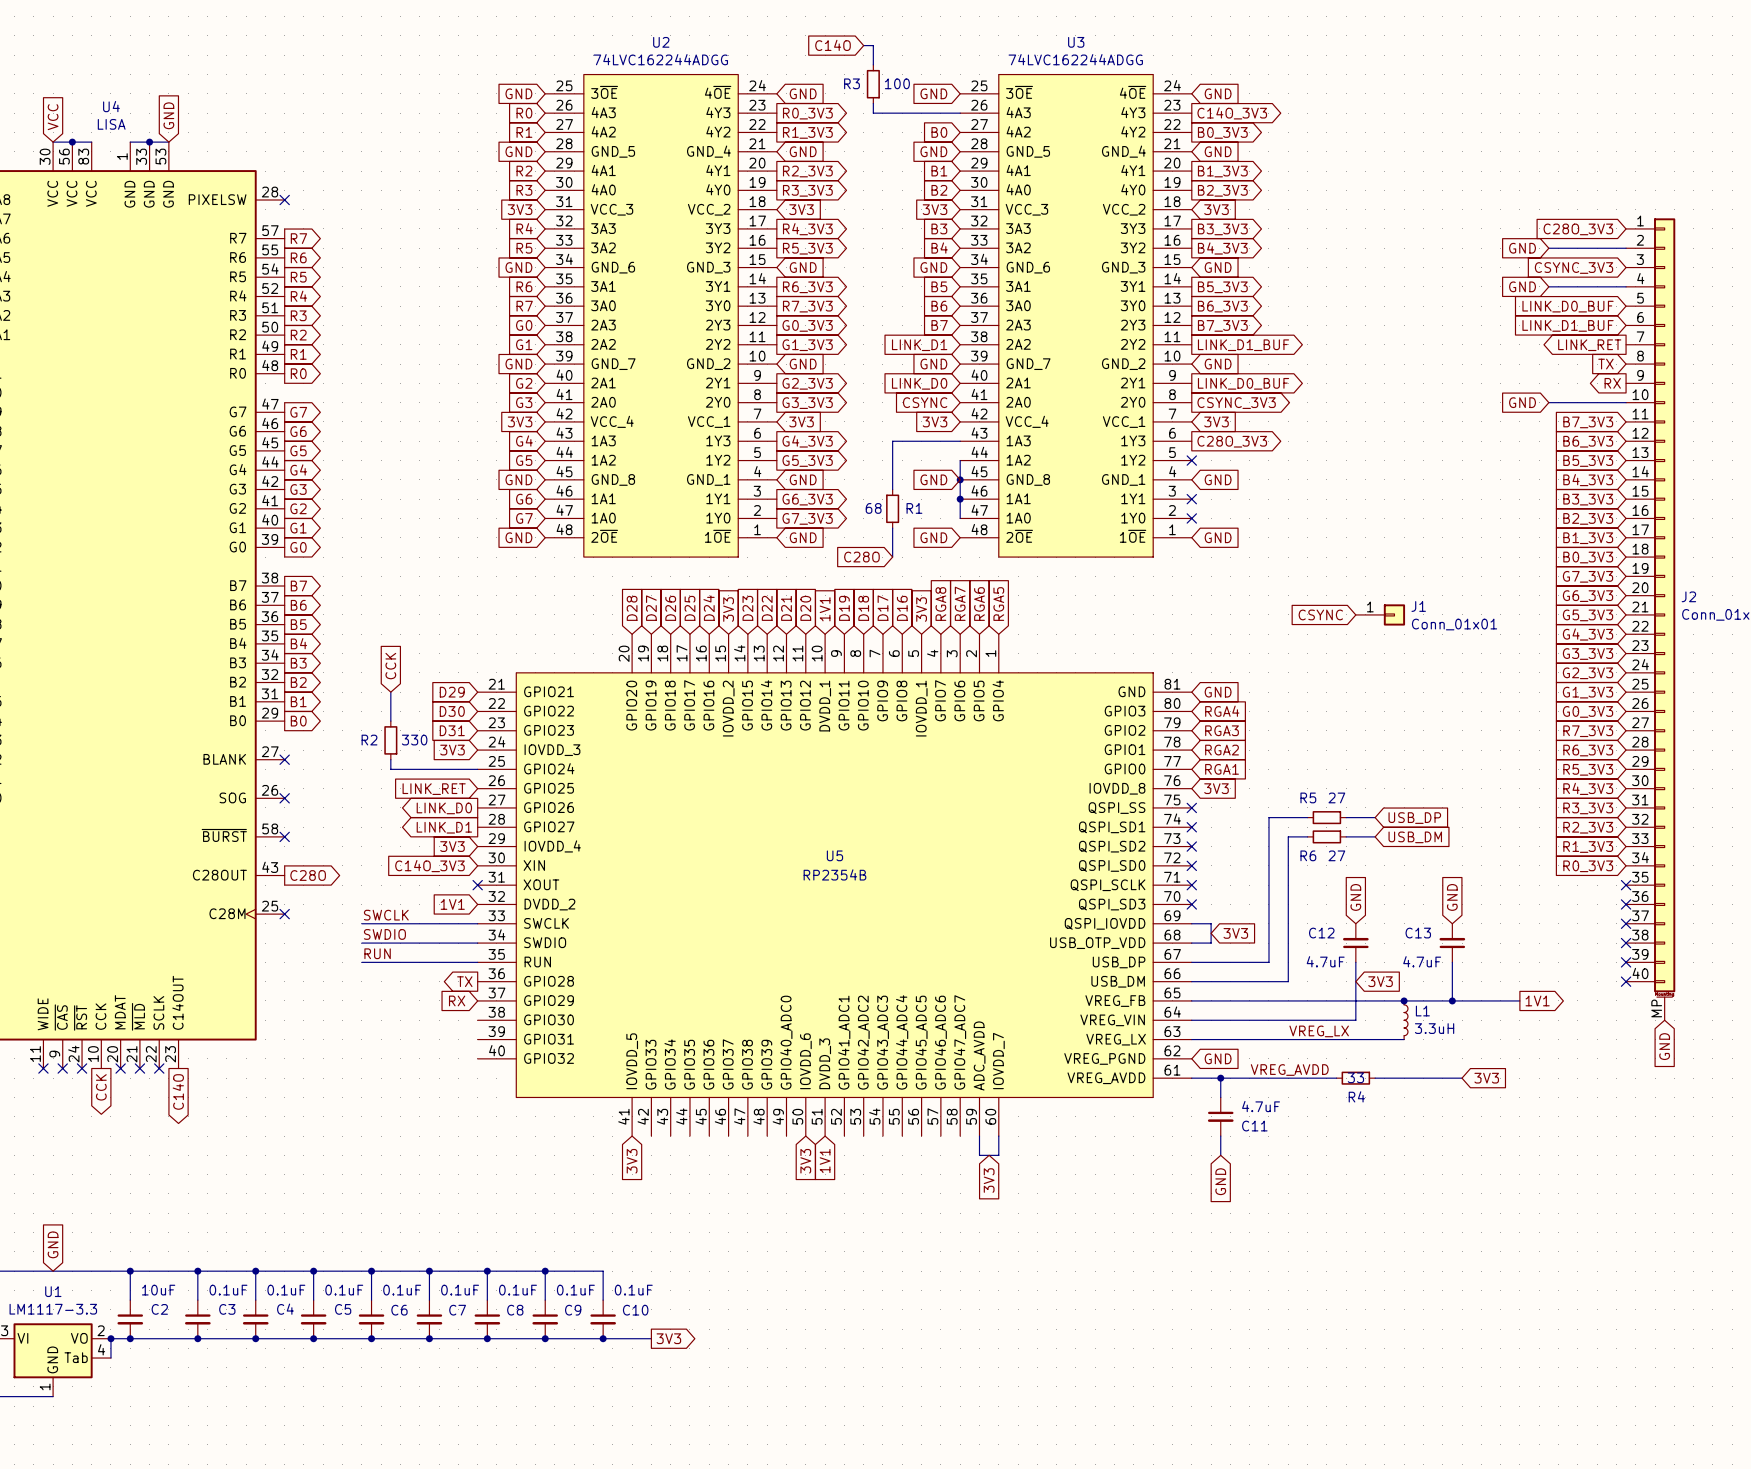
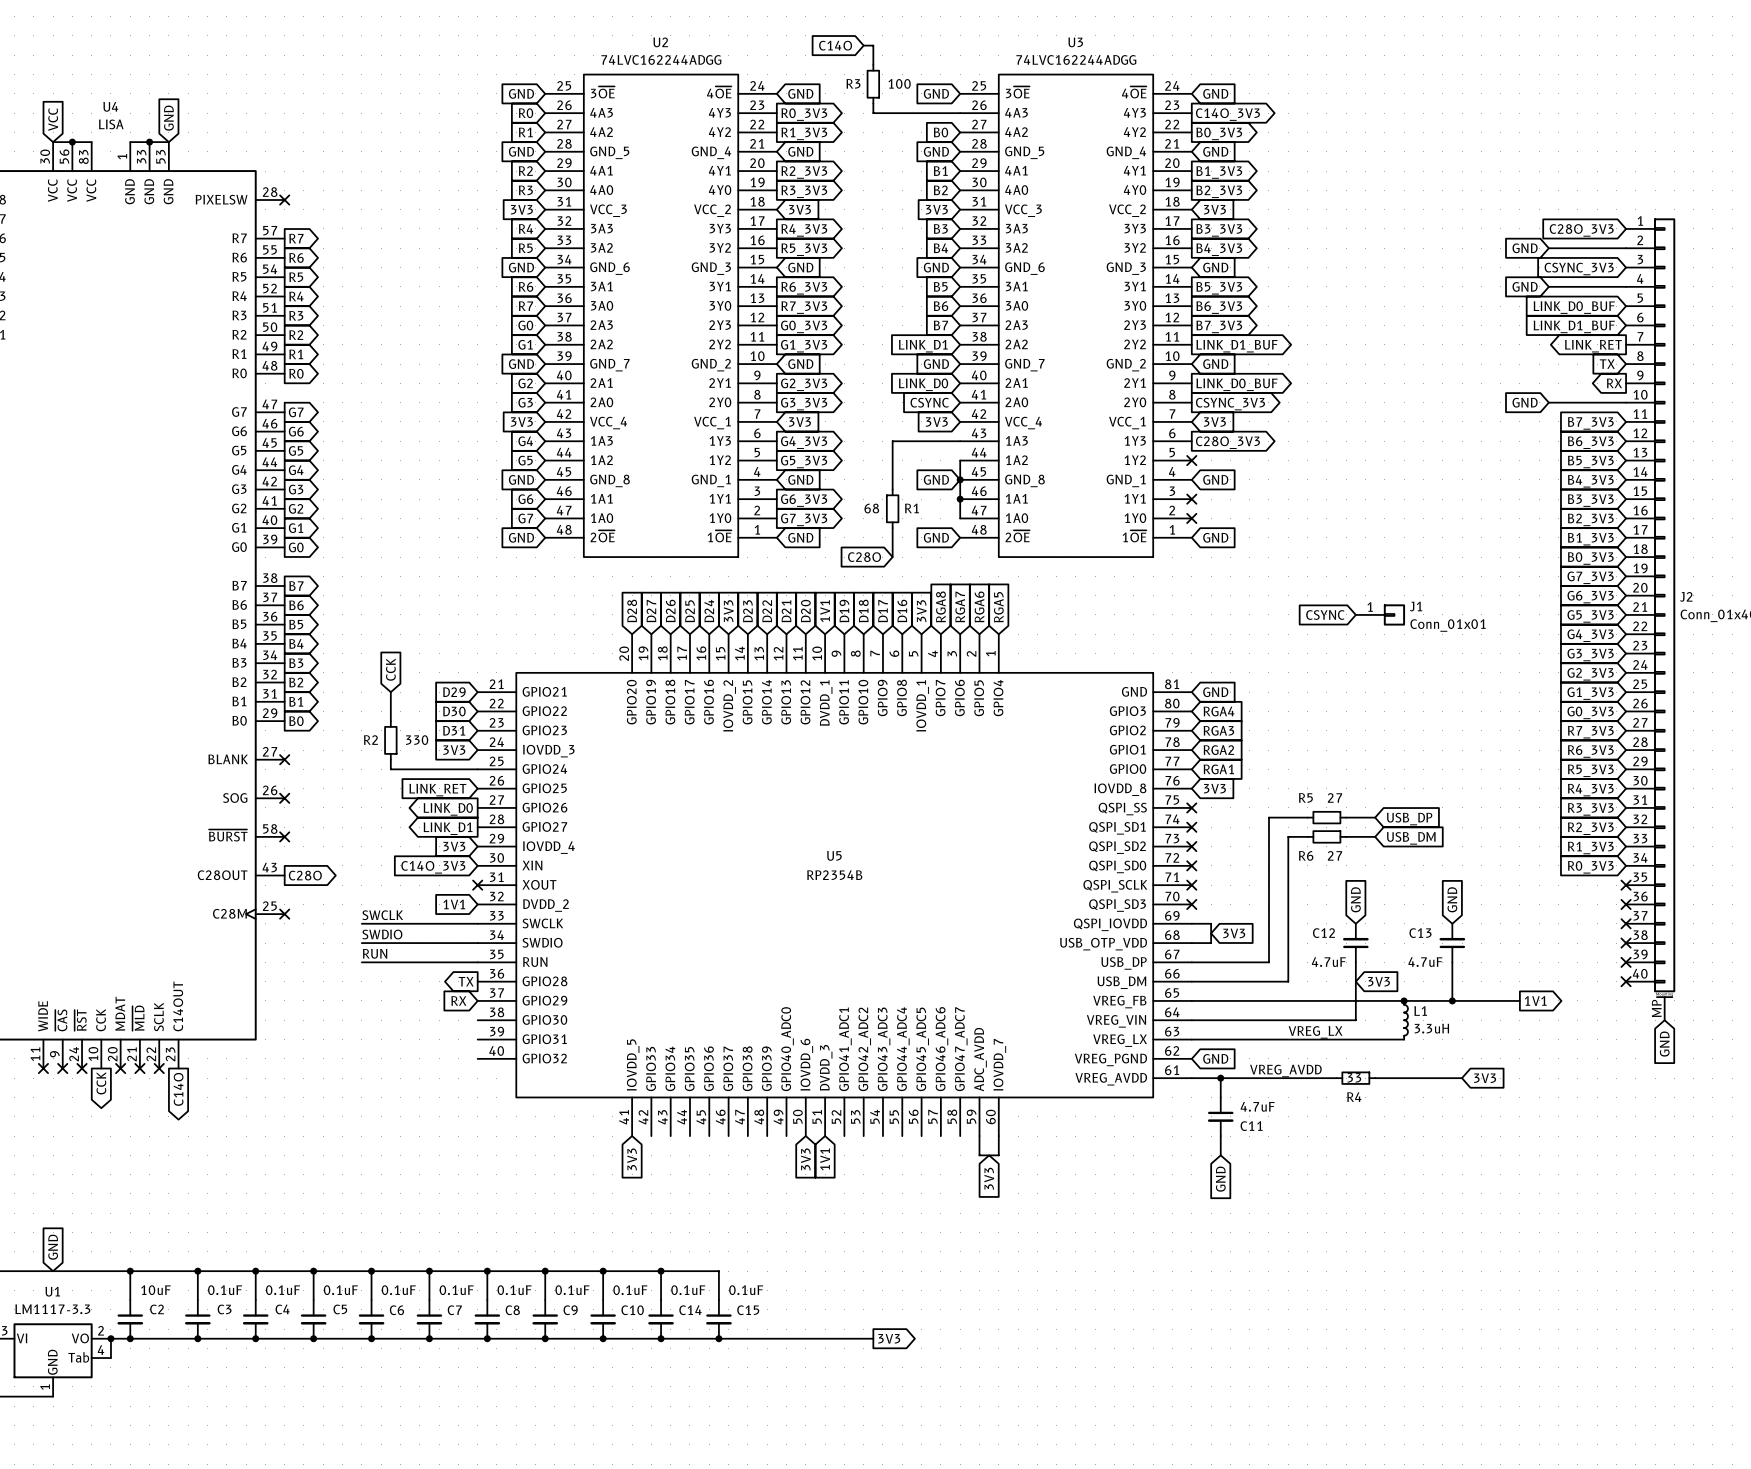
wire: none -> (603, 1271) (718, 1271) (718, 1300)
junction: none -> (603, 1271)
wire: none -> (661, 1271) (661, 1300)
junction: none -> (661, 1271)
C14: none -> 0.1uF (661, 1319)
C15: none -> 0.1uF (718, 1319)
wire: none -> (651, 1338) (873, 1338)
junction: none -> (661, 1338)
global label: 3V3 (668, 1338) -> none
junction: none -> (718, 1338)
global label: none -> 3V3 (889, 1338)

